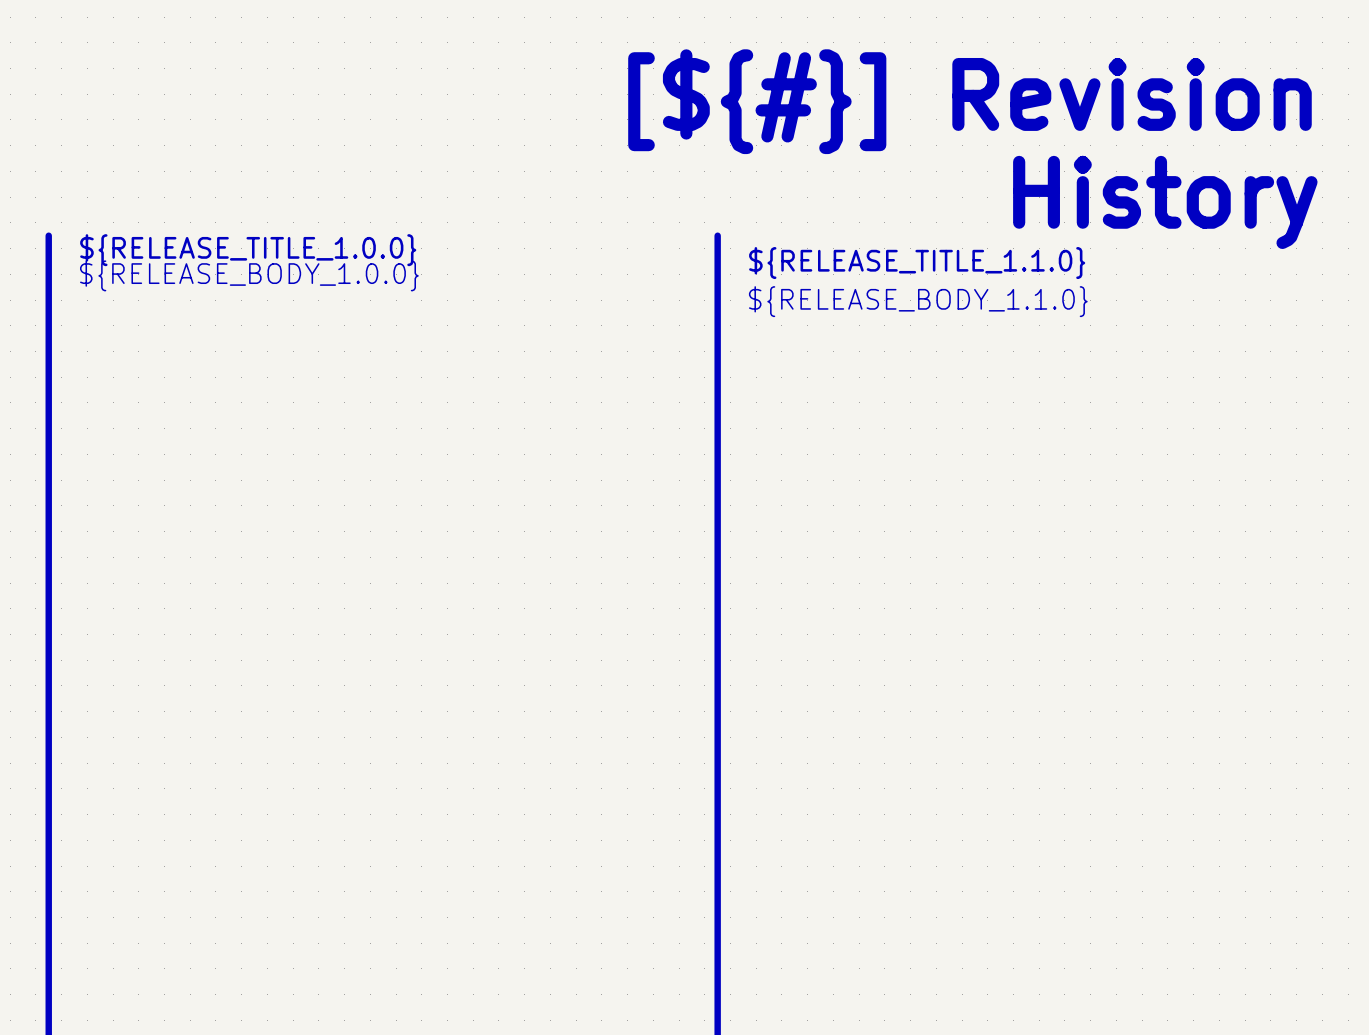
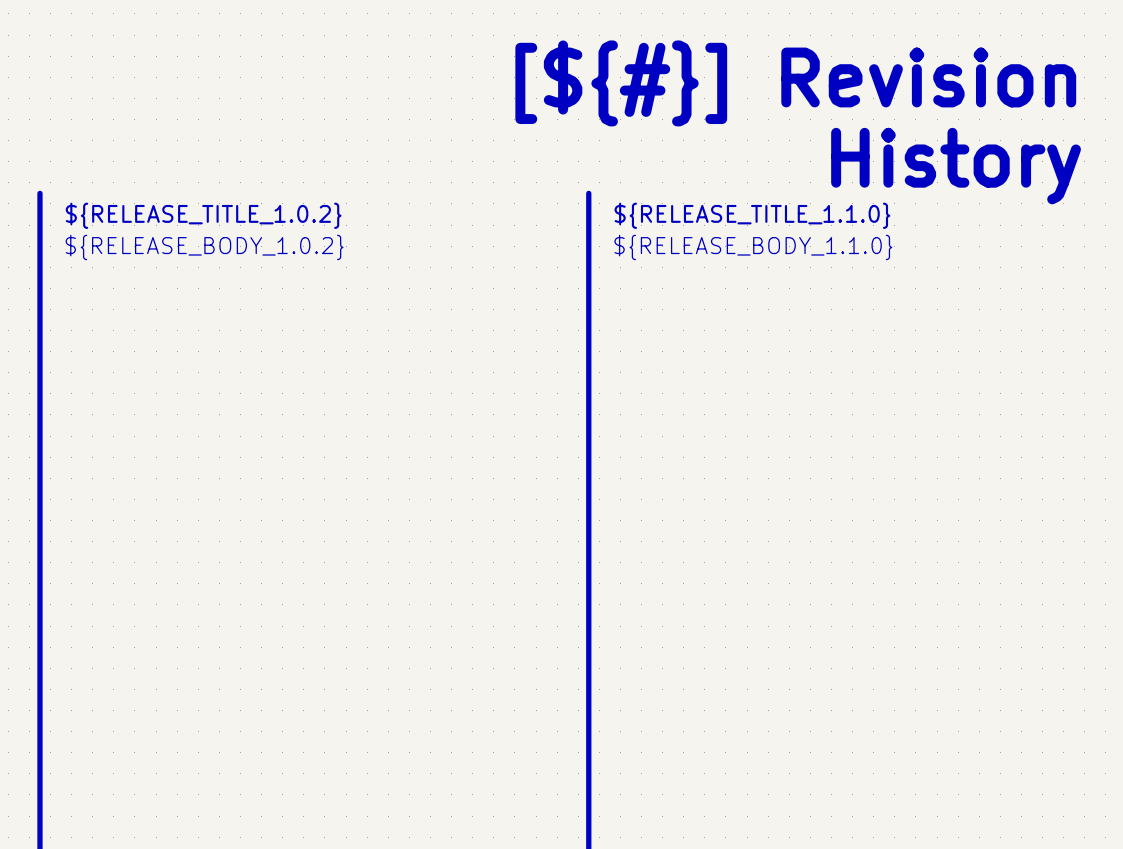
text: ${RELEASE_TITLE_1.0.0} (248, 250) -> none
text: none -> ${RELEASE_TITLE_1.0.2} (203, 215)
text: ${RELEASE_BODY_1.0.0} (249, 275) -> none
text: none -> ${RELEASE_BODY_1.0.2} (204, 247)

